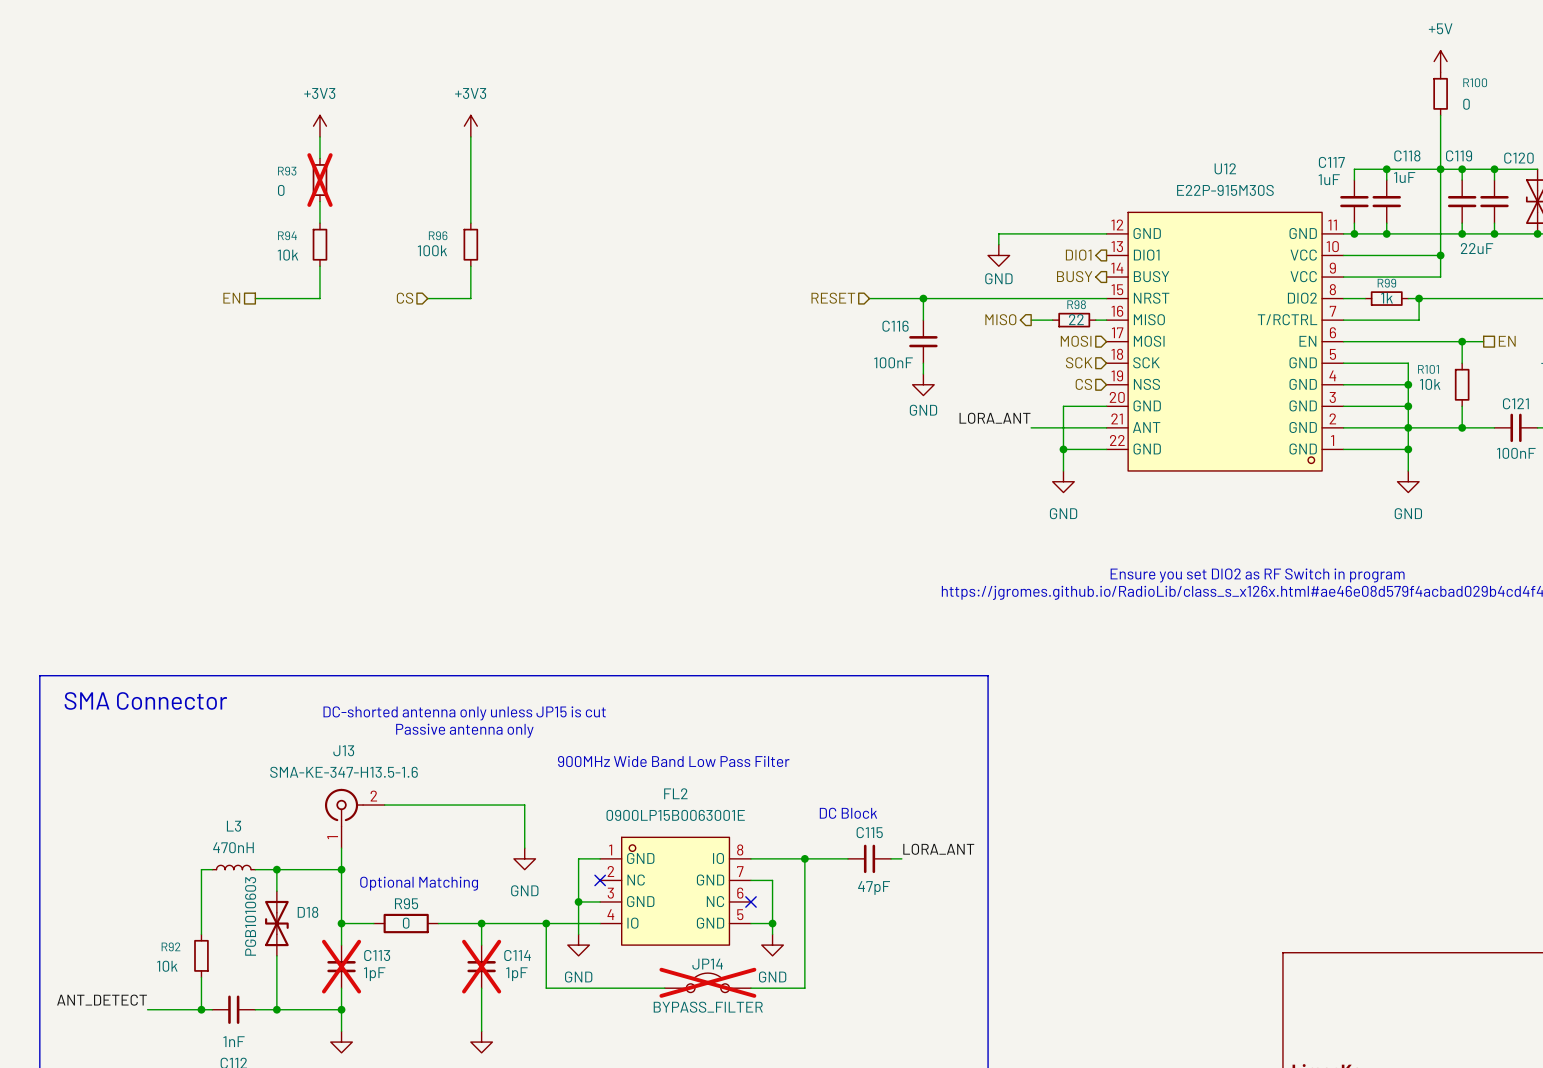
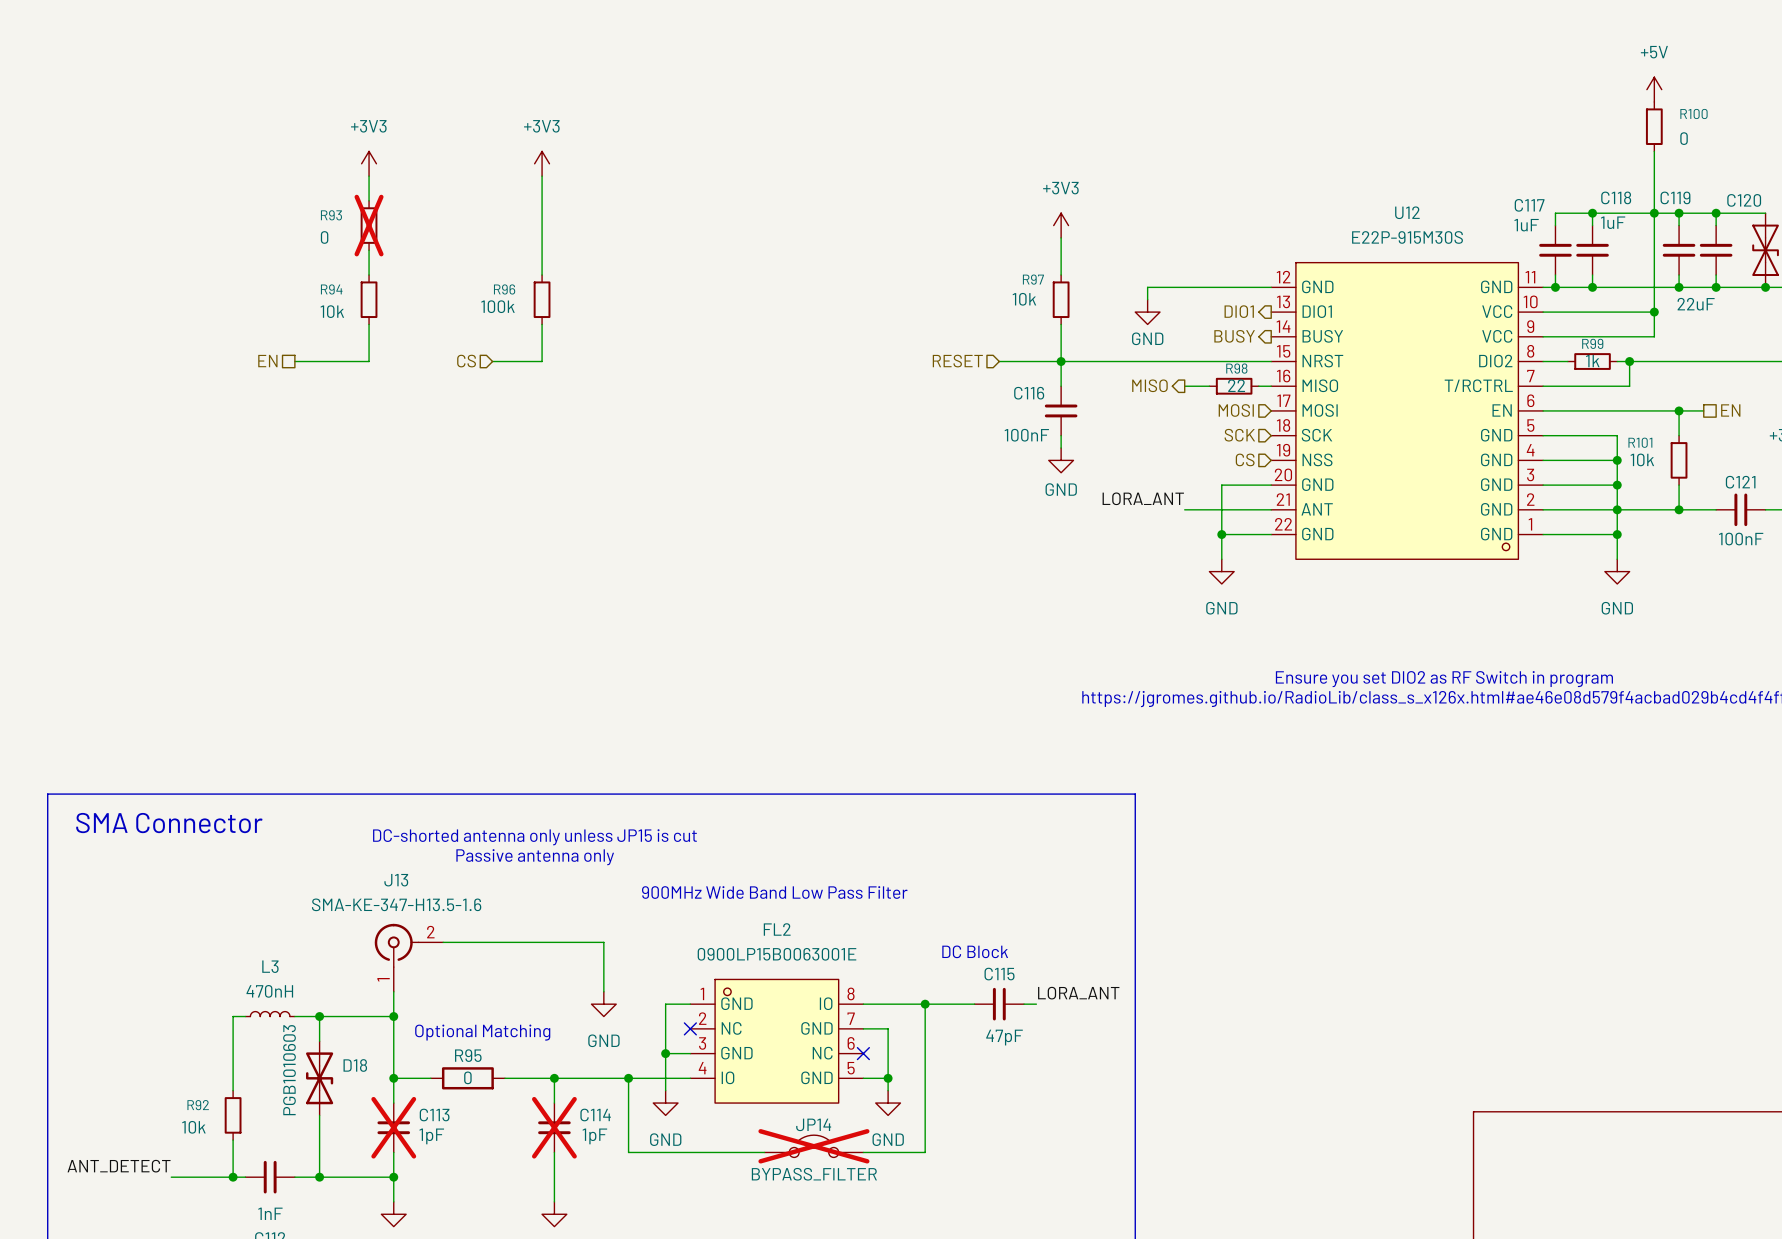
power symbol: none -> +3V3 (1061, 225)
wire: none -> (1061, 237) (1061, 275)
R97: none -> 10k (1061, 299)
wire: none -> (1061, 324) (1061, 361)

